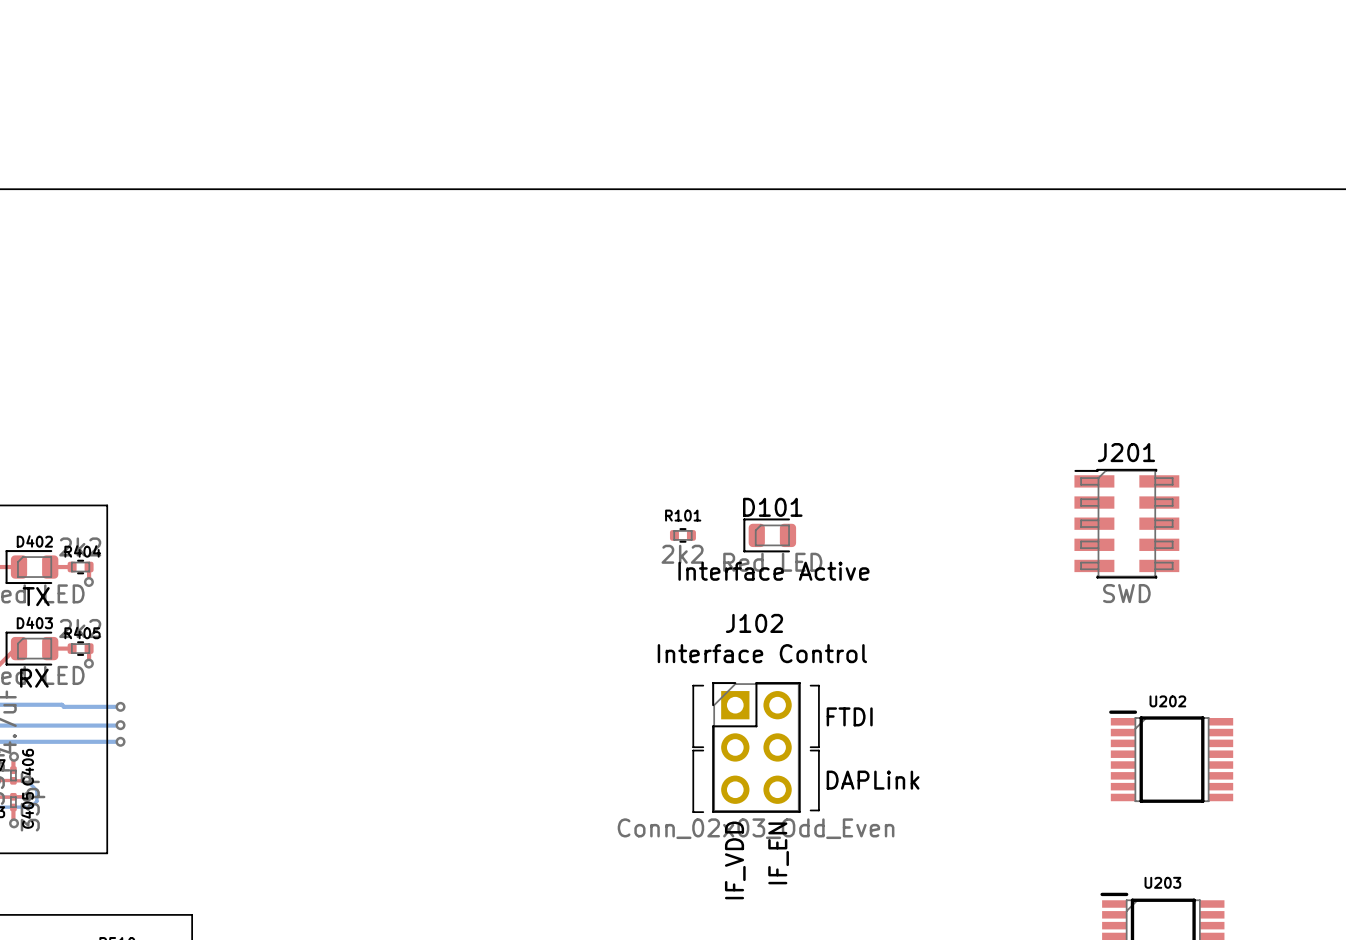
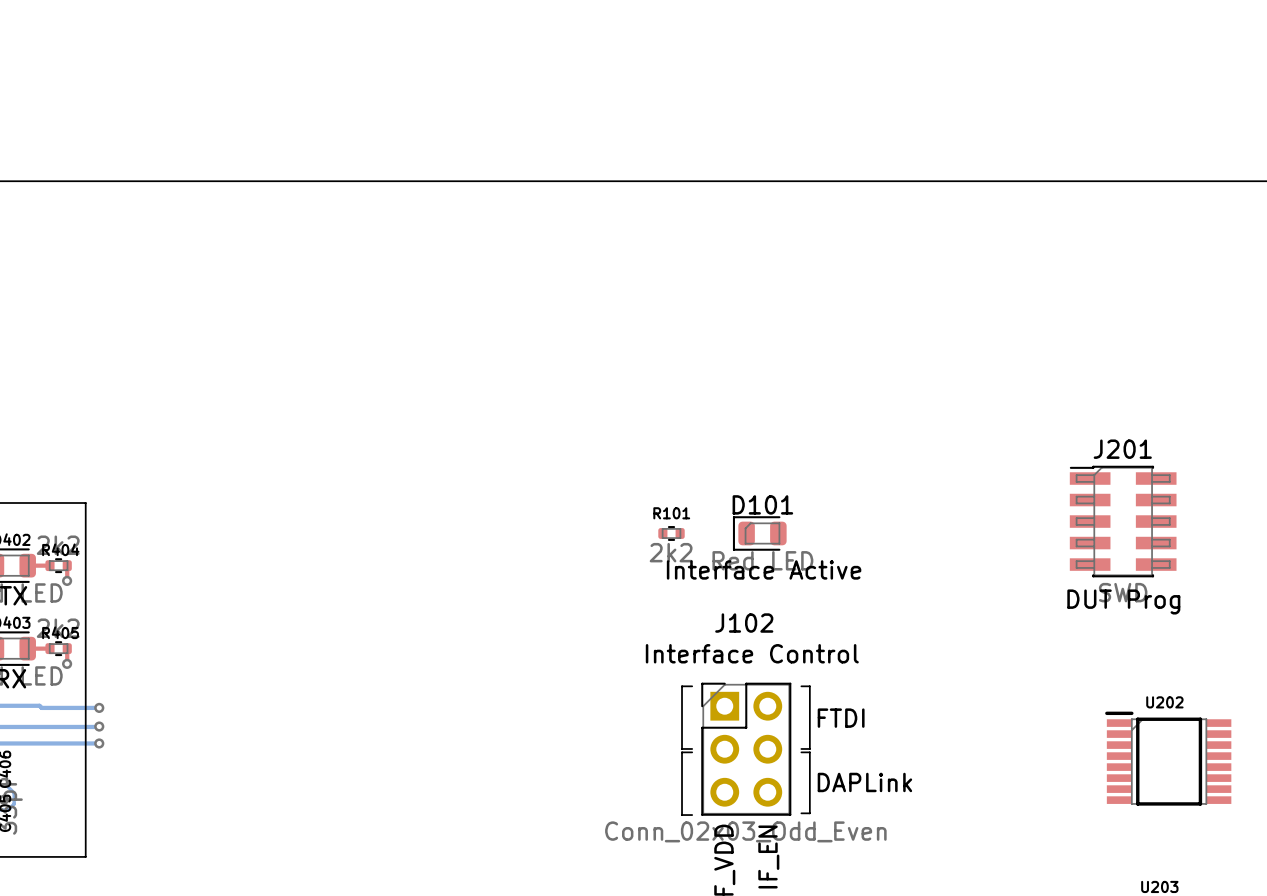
text: none -> DUT Prog (1123, 601)

